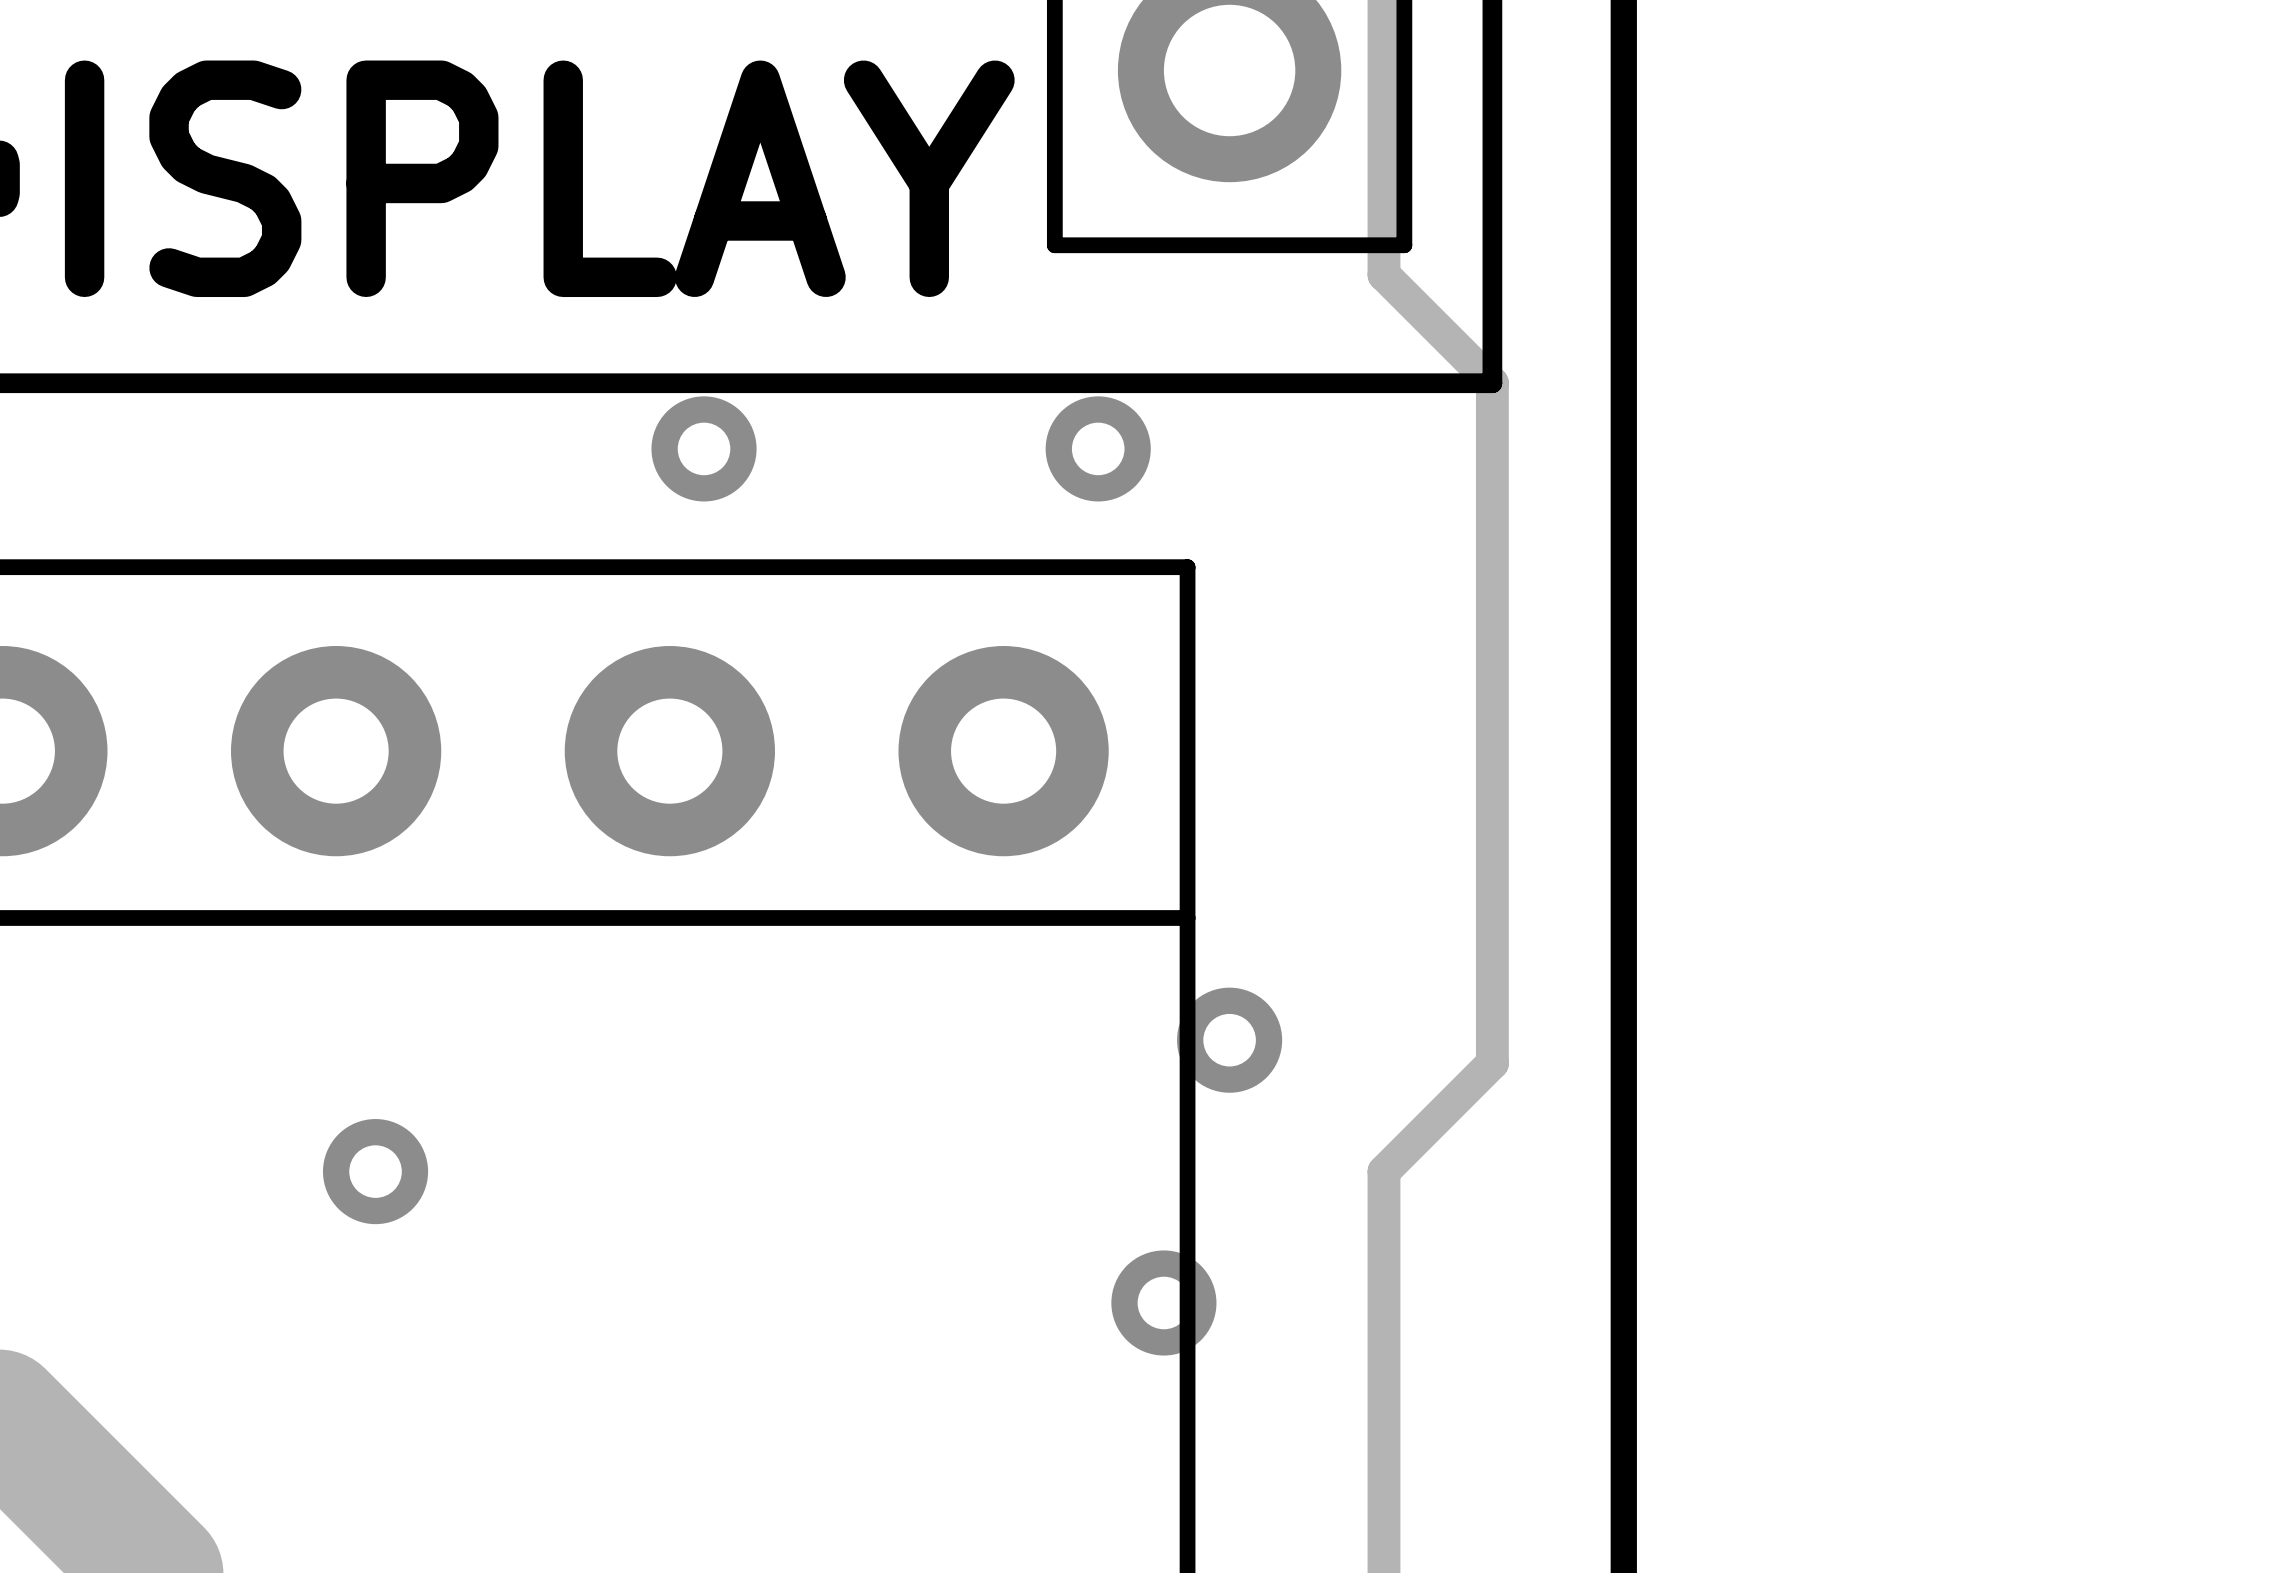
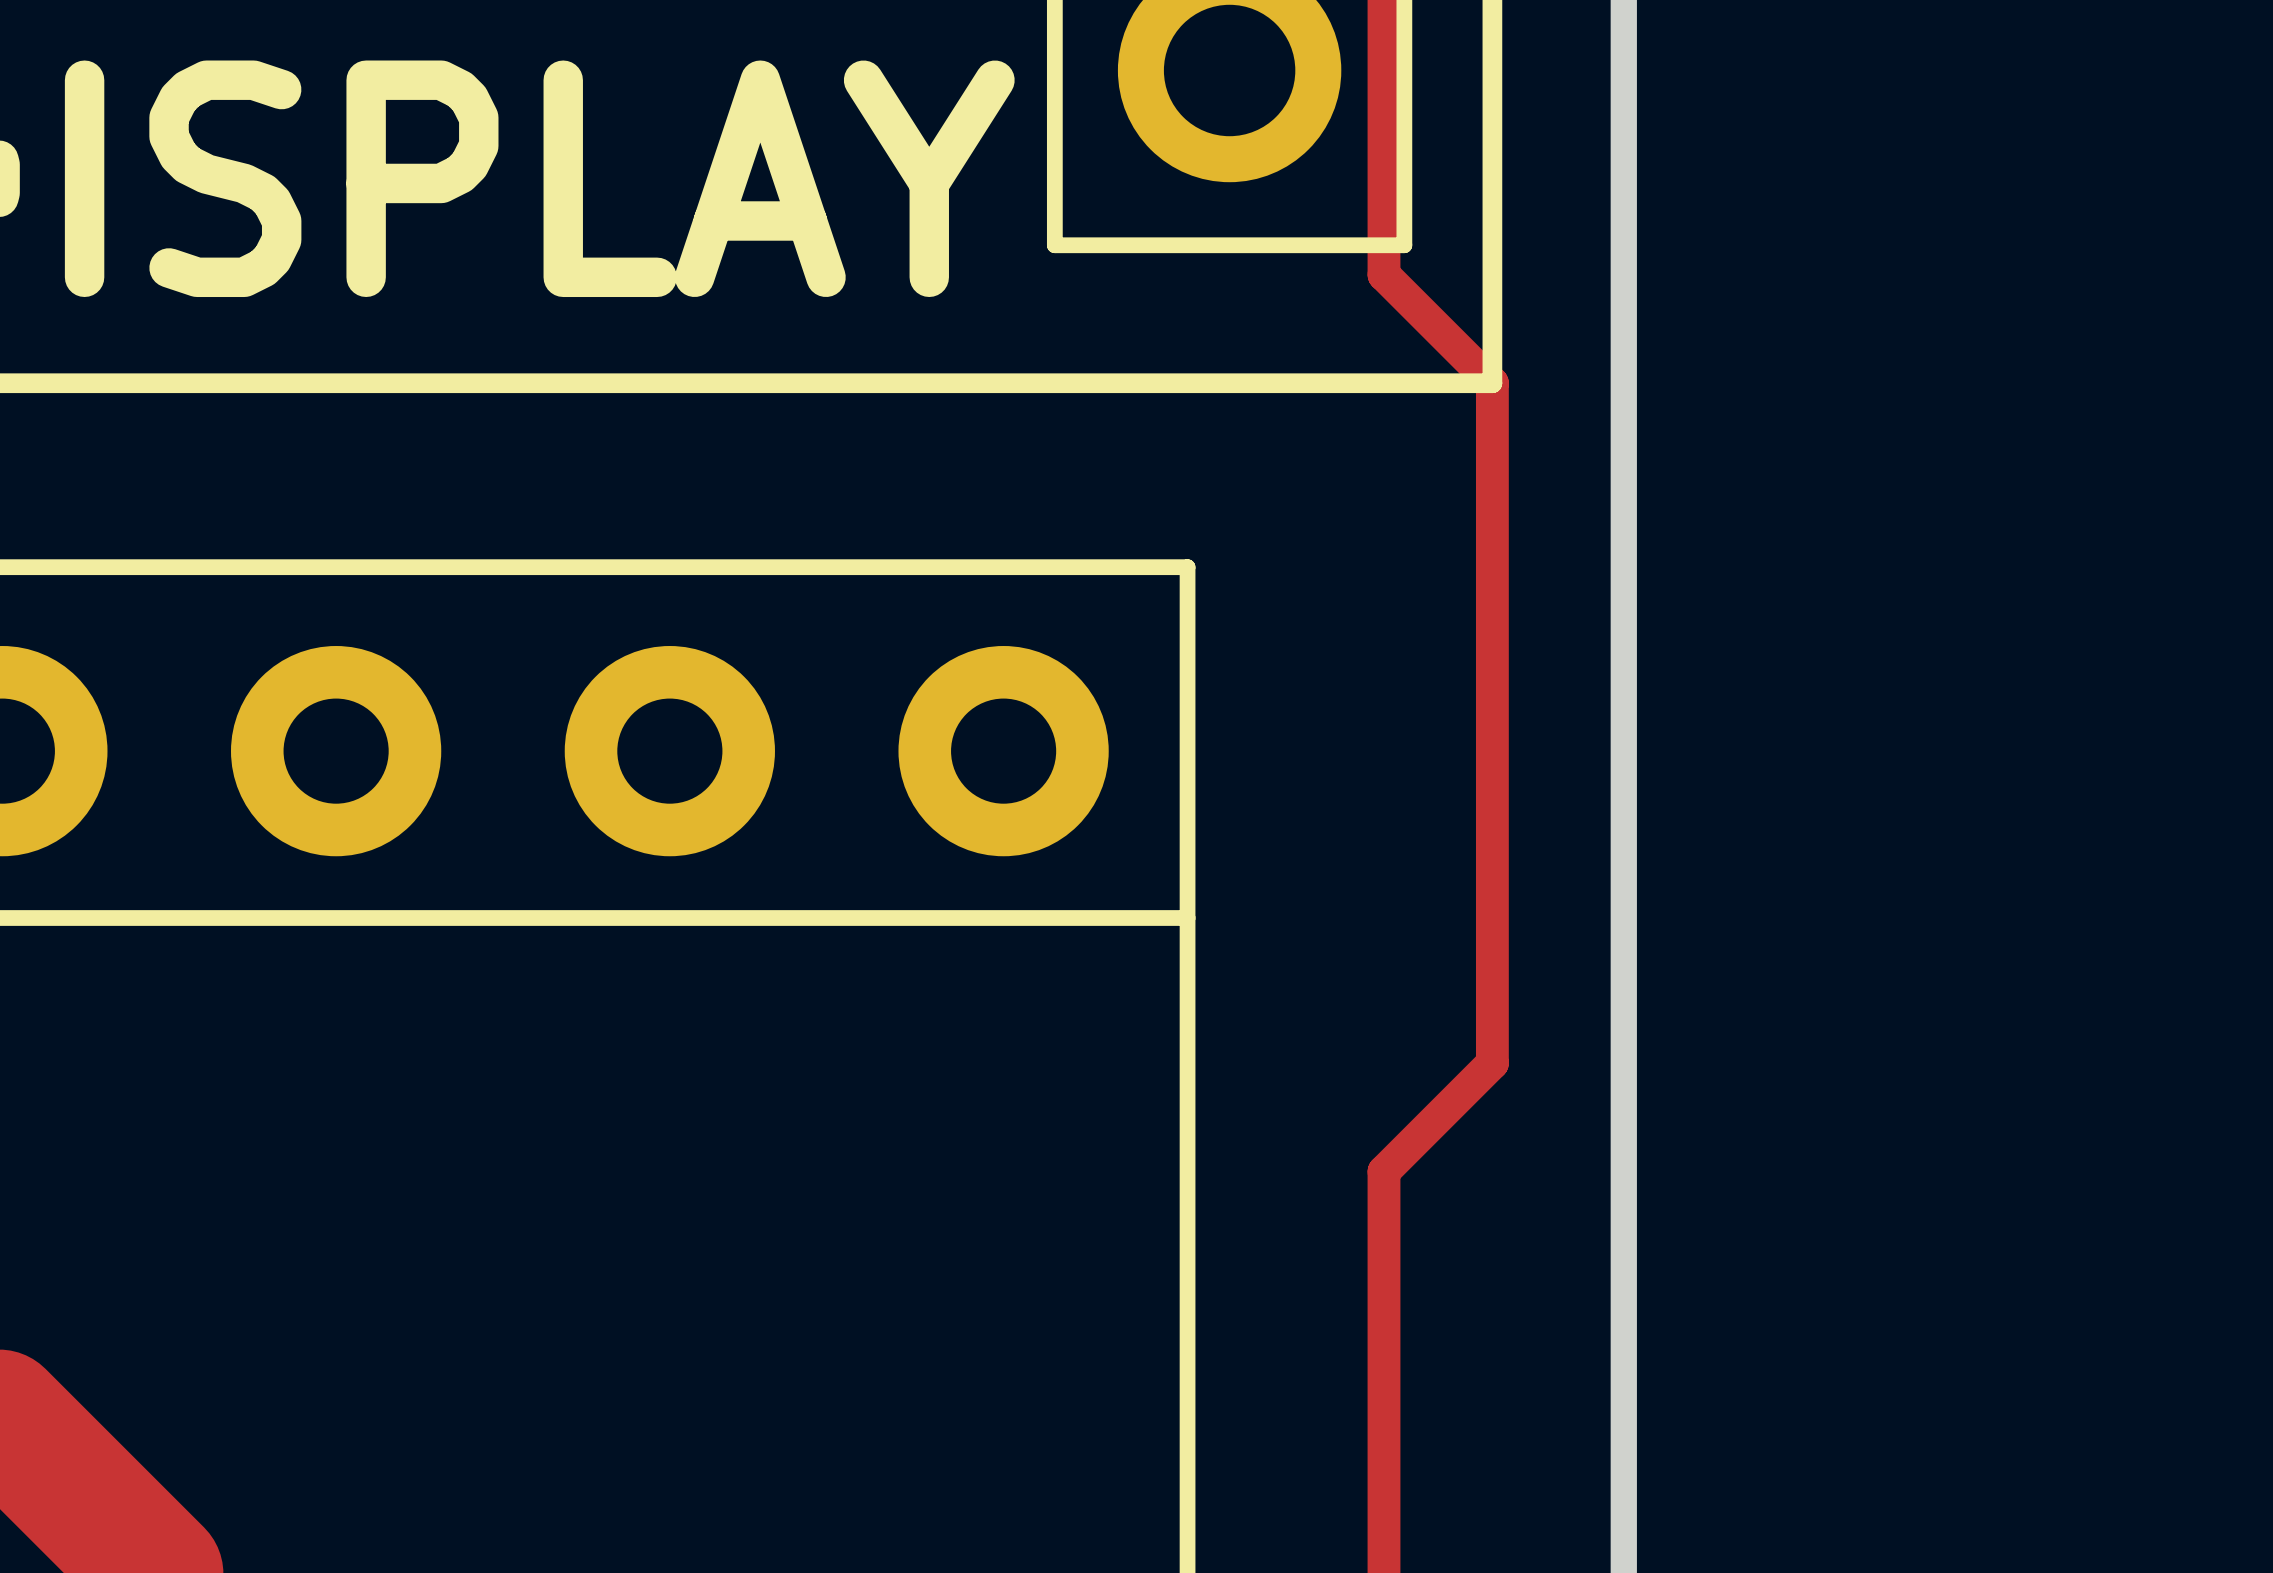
via: (704, 448) -> none
via: (1098, 448) -> none
via: (1229, 1040) -> none
via: (375, 1171) -> none
via: (1163, 1302) -> none

